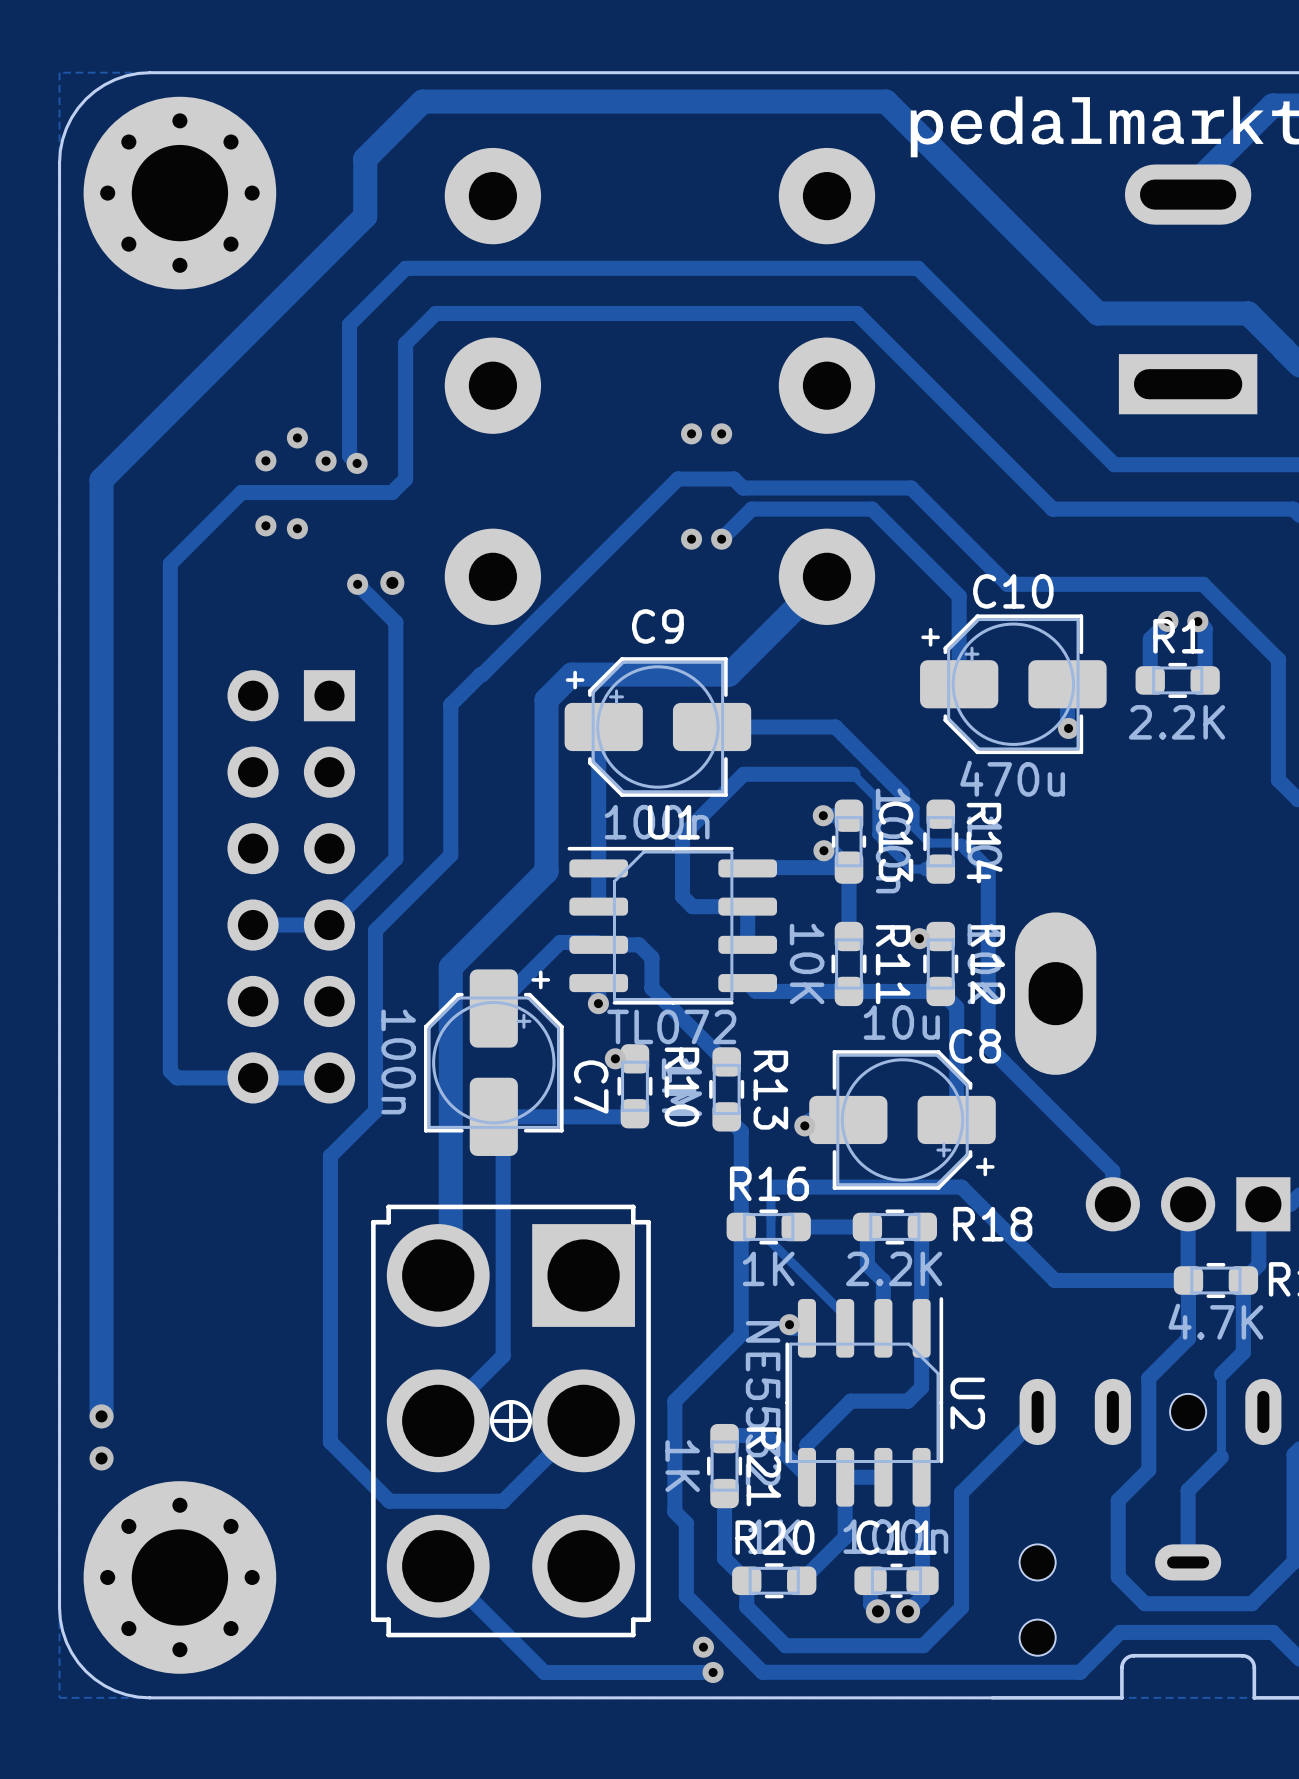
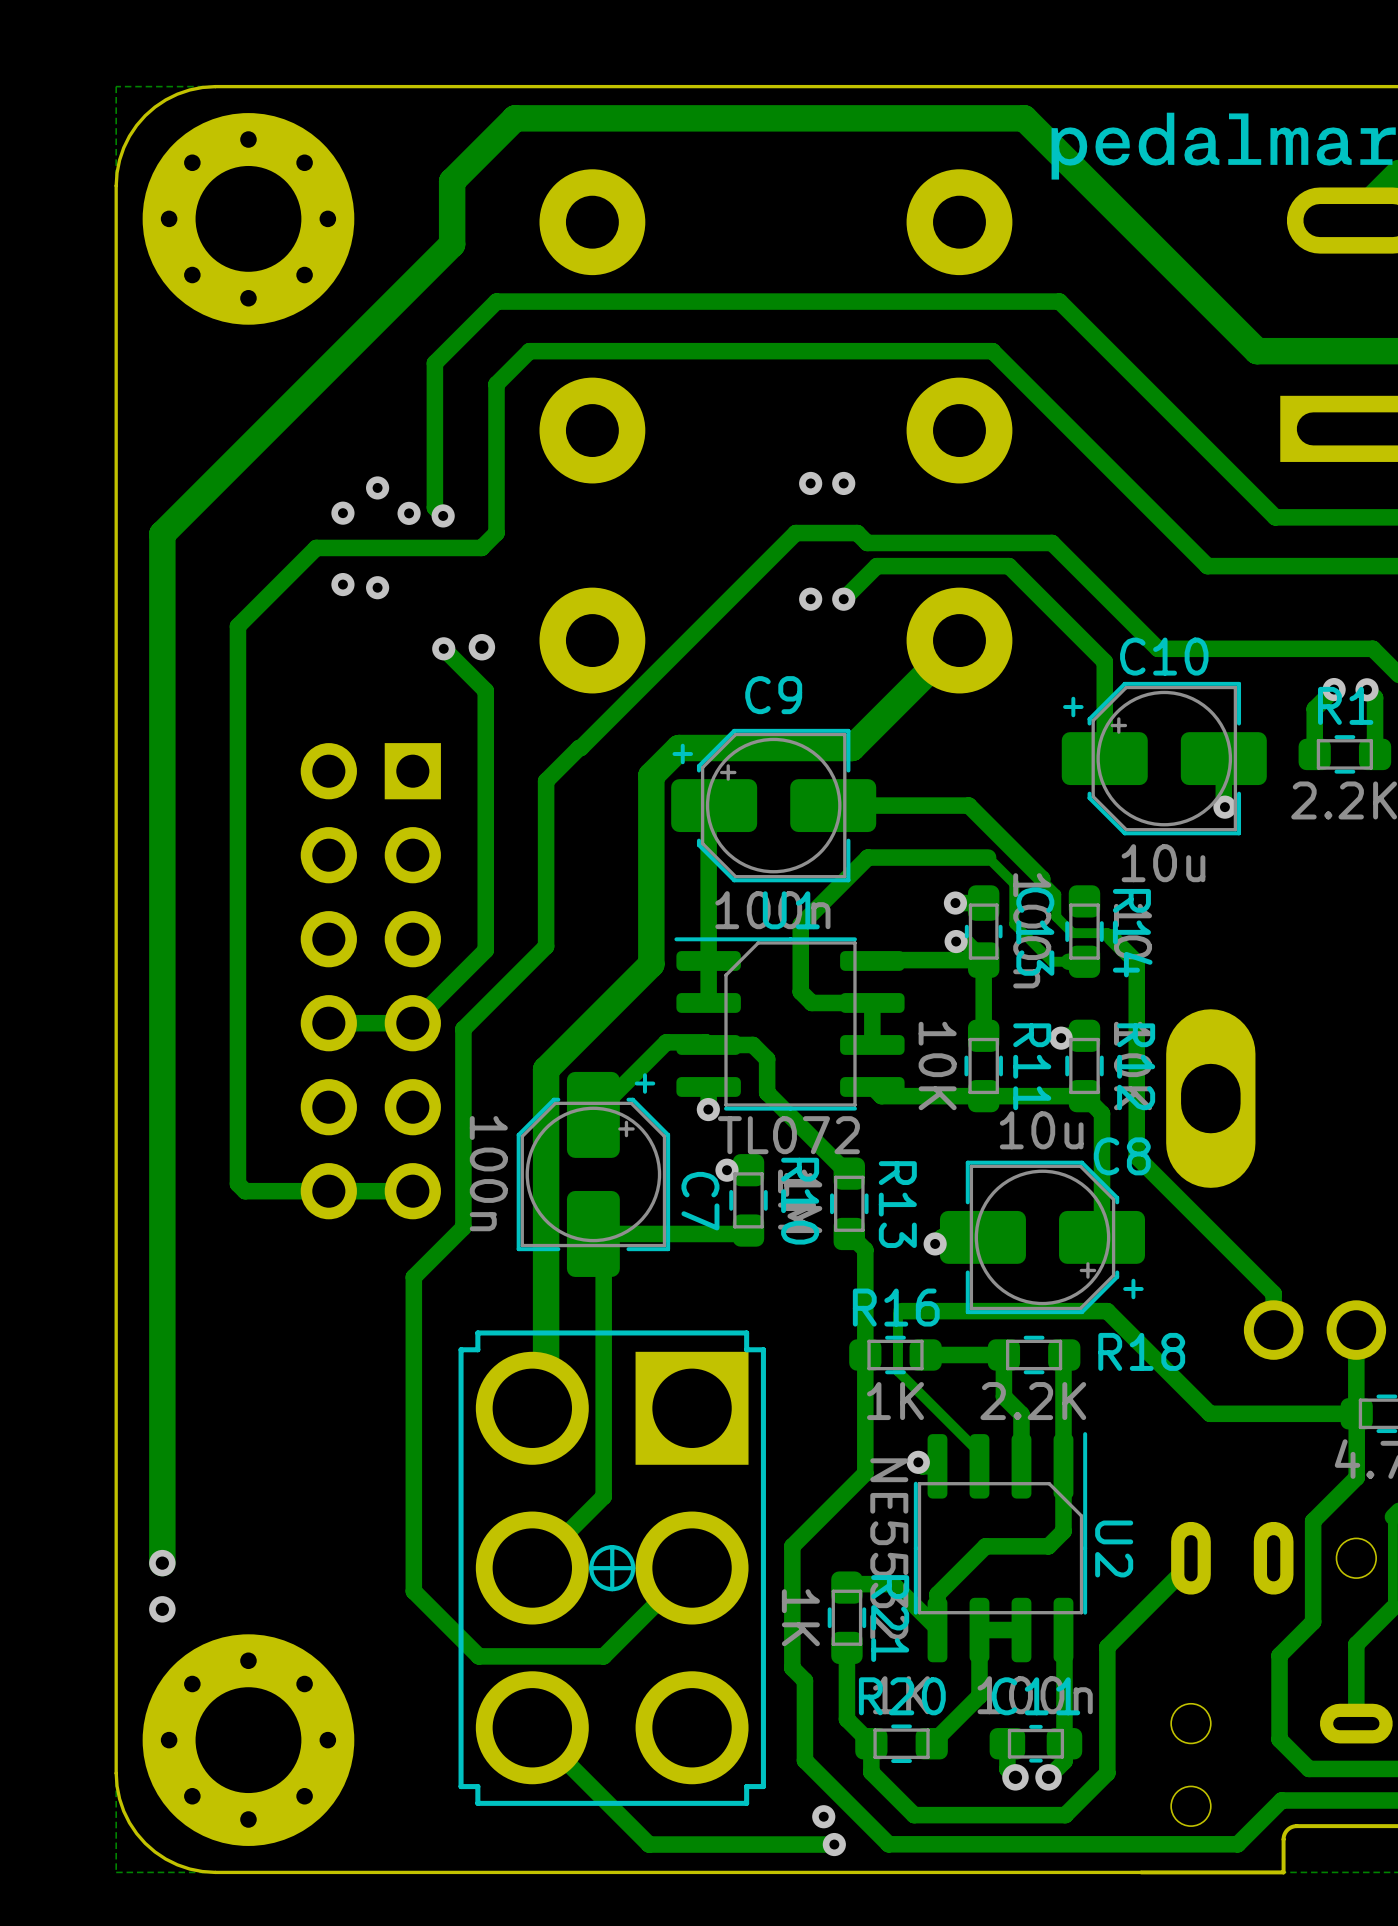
C10 value: 470u (1012, 778) -> 10u (1163, 863)

